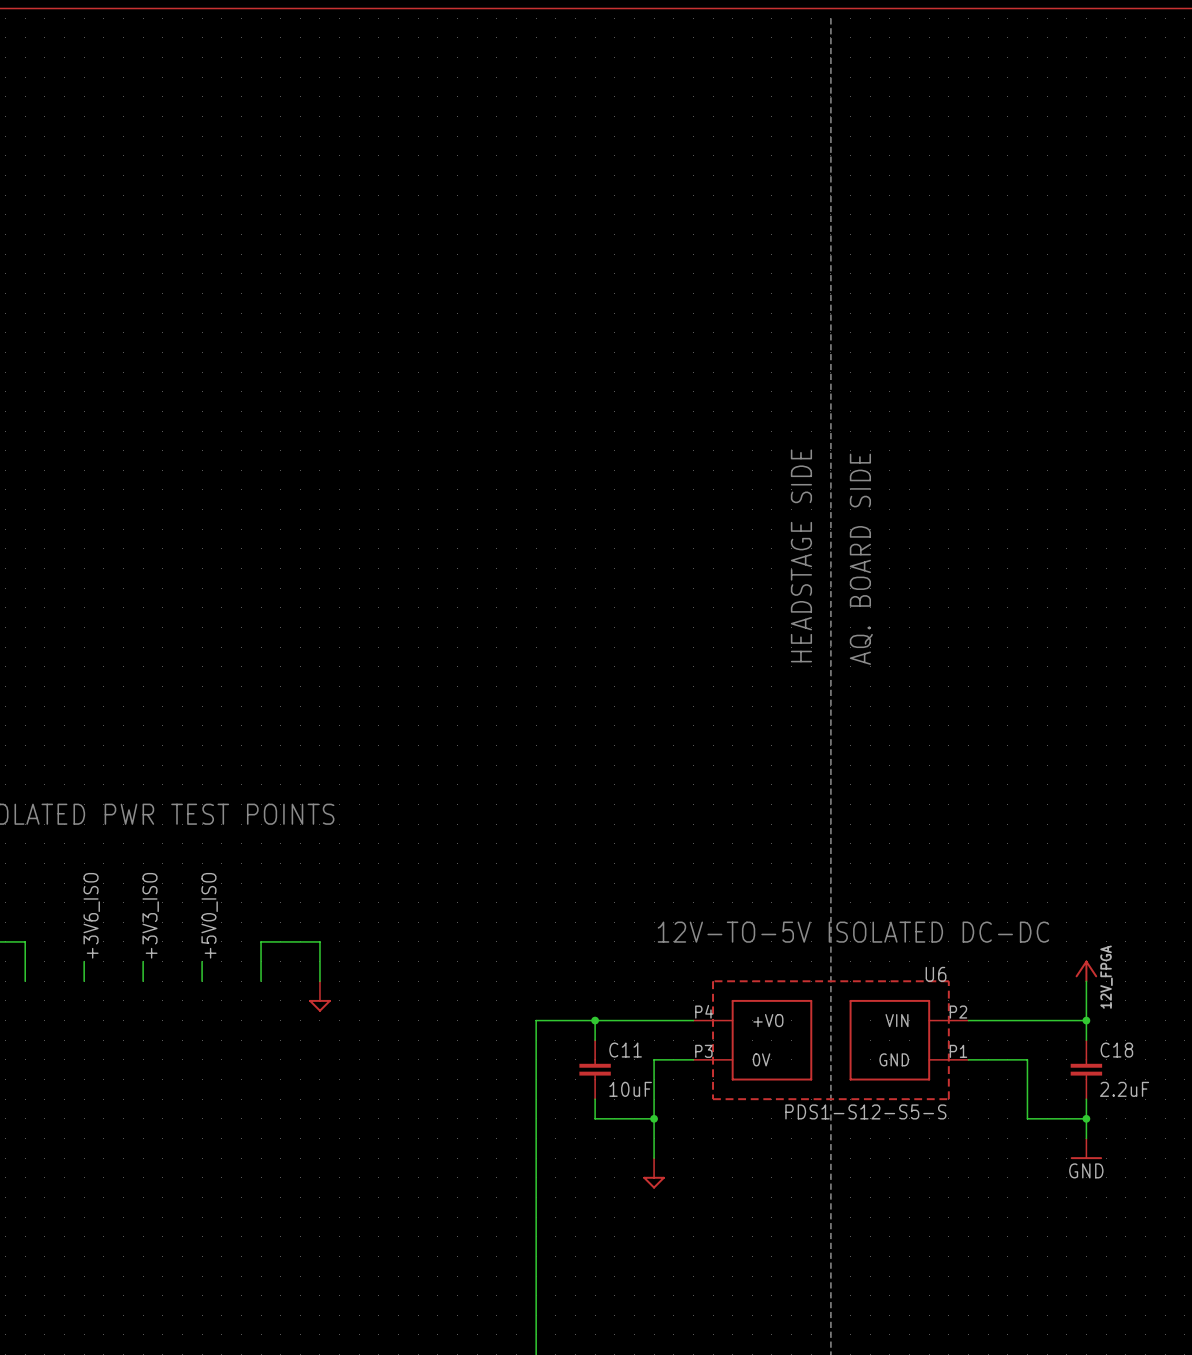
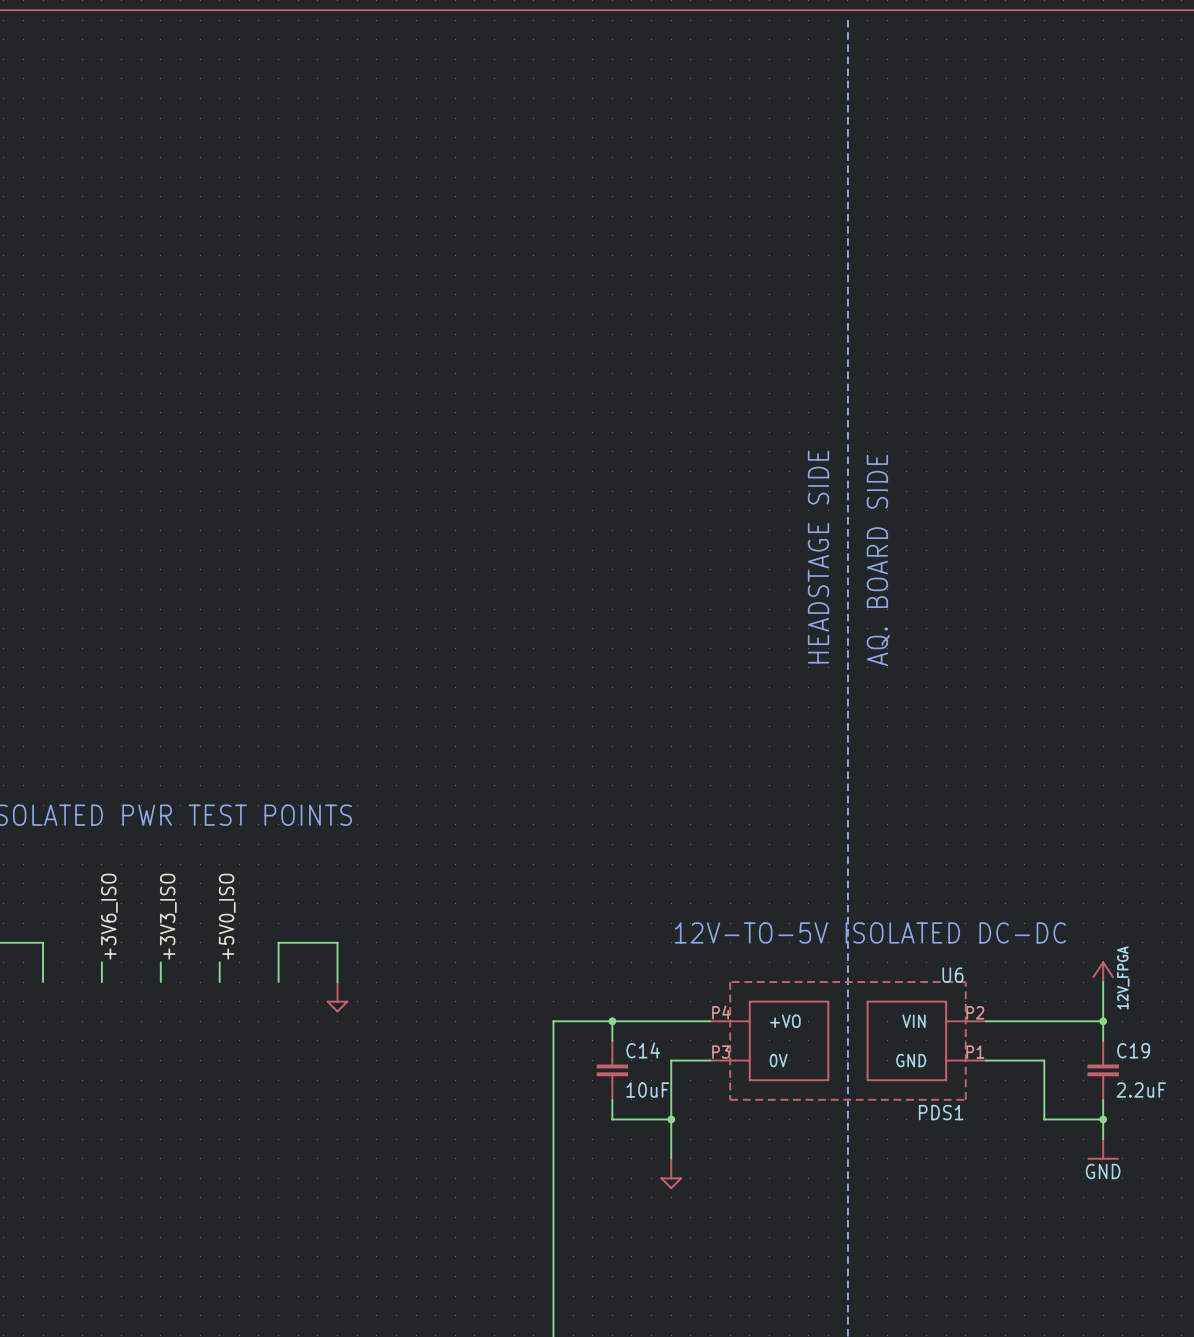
C11 name: C11 (625, 1050) -> C14 (643, 1050)
C18 name: C18 (1116, 1050) -> C19 (1133, 1050)
U6 value: PDS1-S12-S5-S (865, 1111) -> PDS1 (941, 1112)

